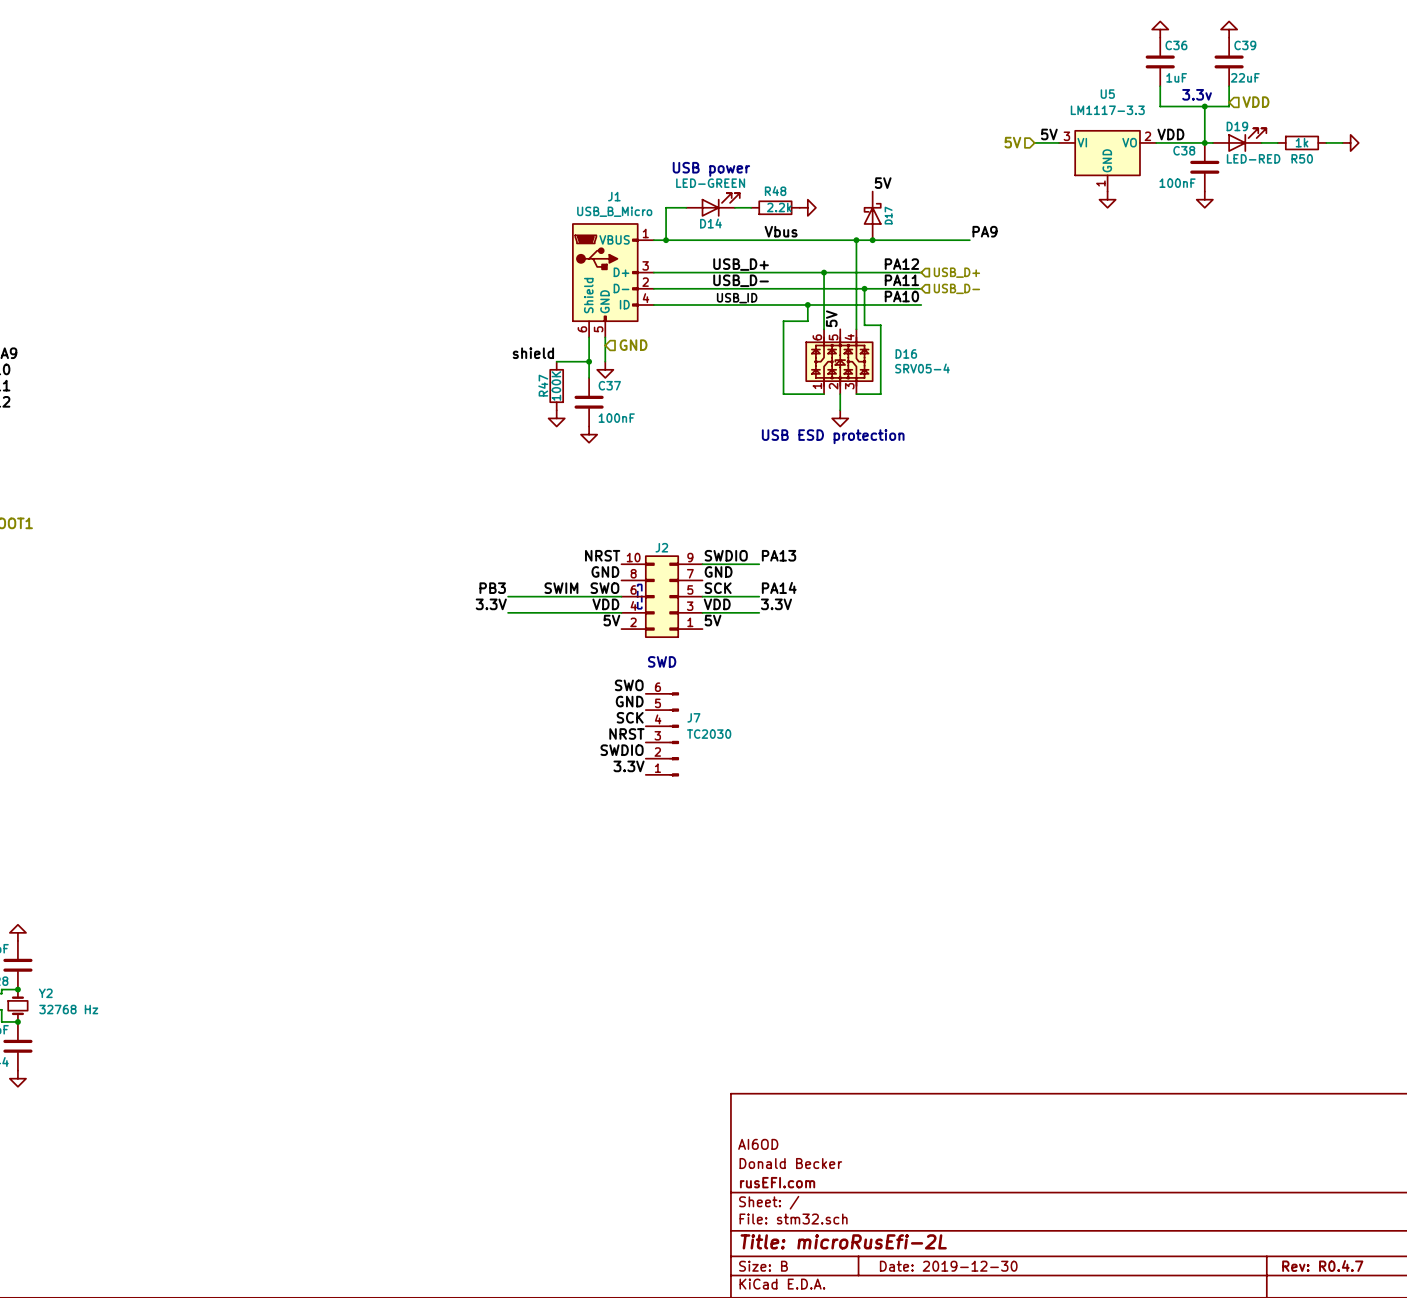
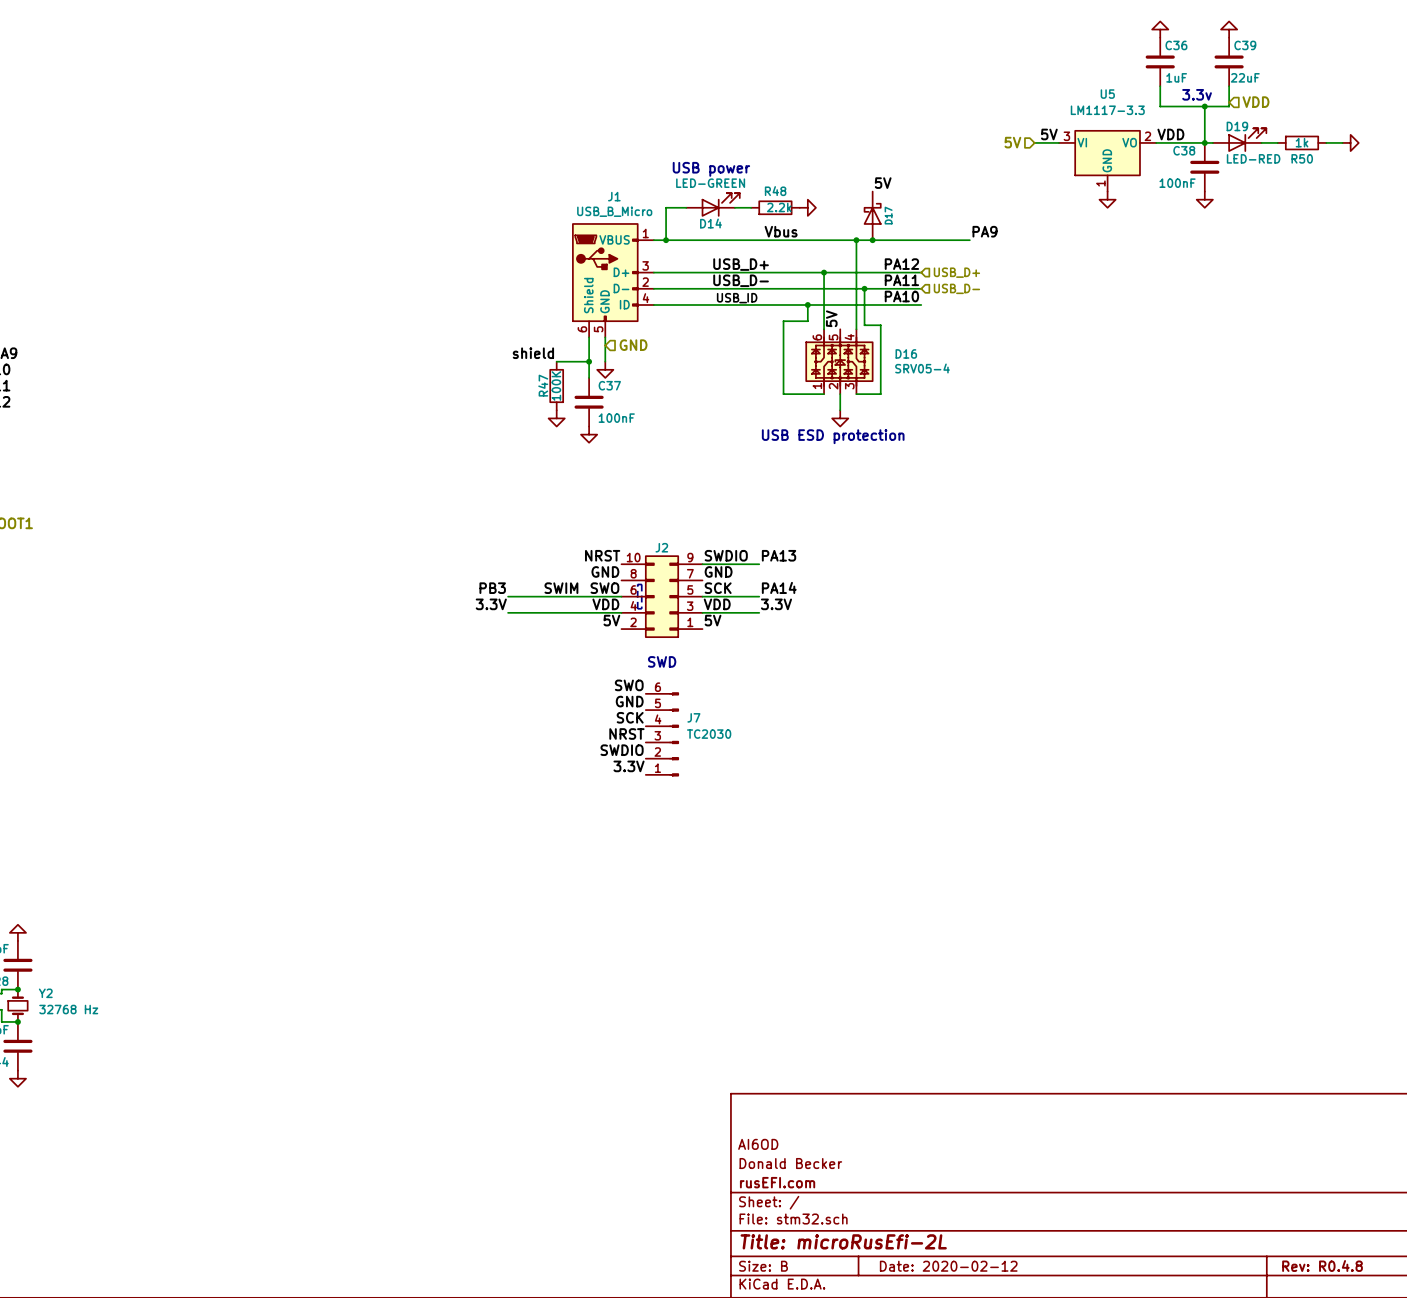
title block: Rev: R0.4.7 (1322, 1265) -> Rev: R0.4.8 (1322, 1265)
title block: Date: 2019-12-30 (948, 1266) -> Date: 2020-02-12 (948, 1266)

